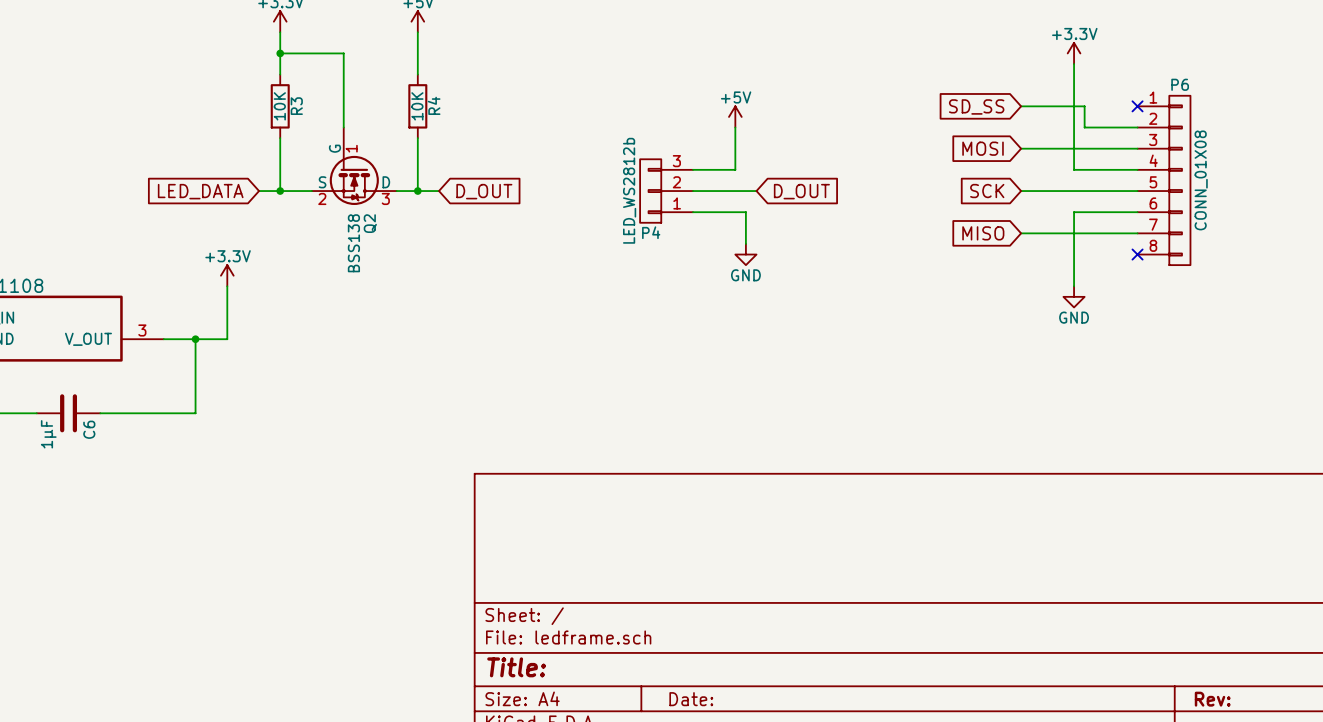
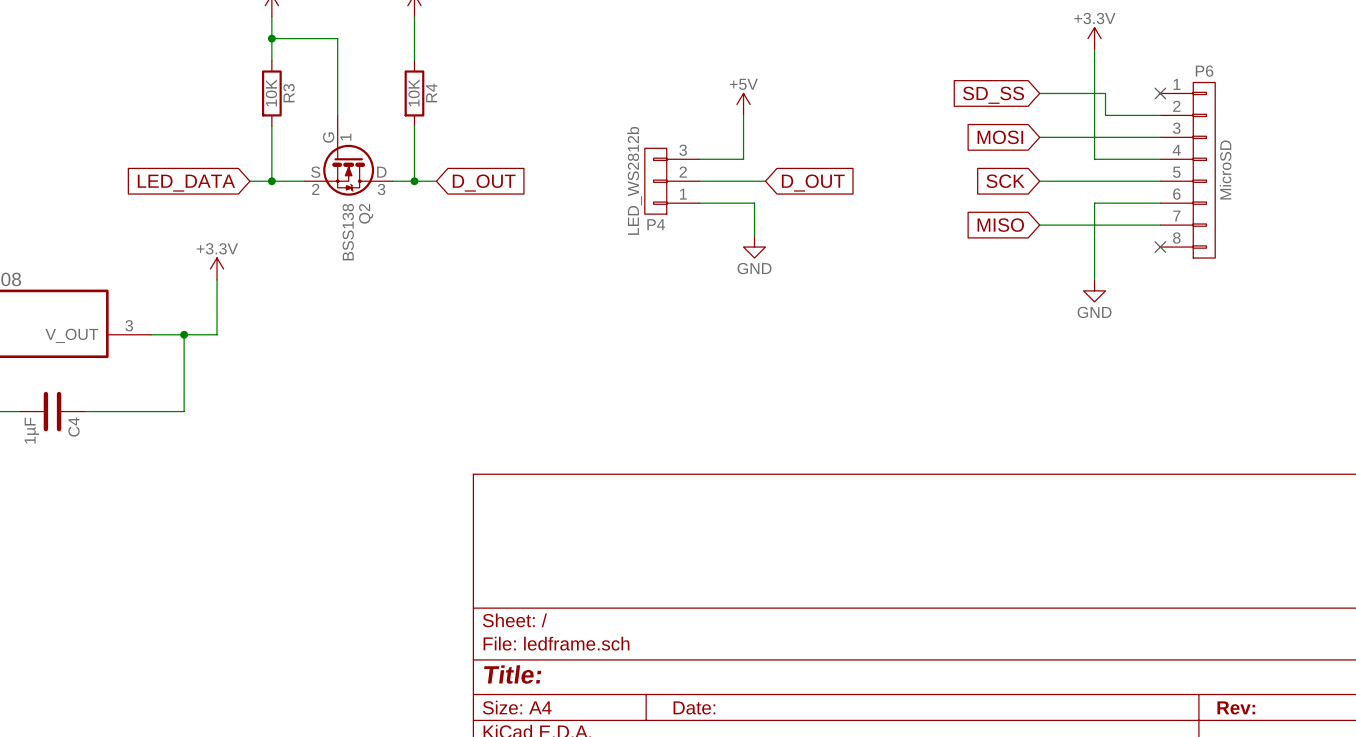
P6 value: CONN_01X08 (1201, 180) -> MicroSD (1225, 169)
C6 name: C6 (89, 429) -> C4 (74, 427)

